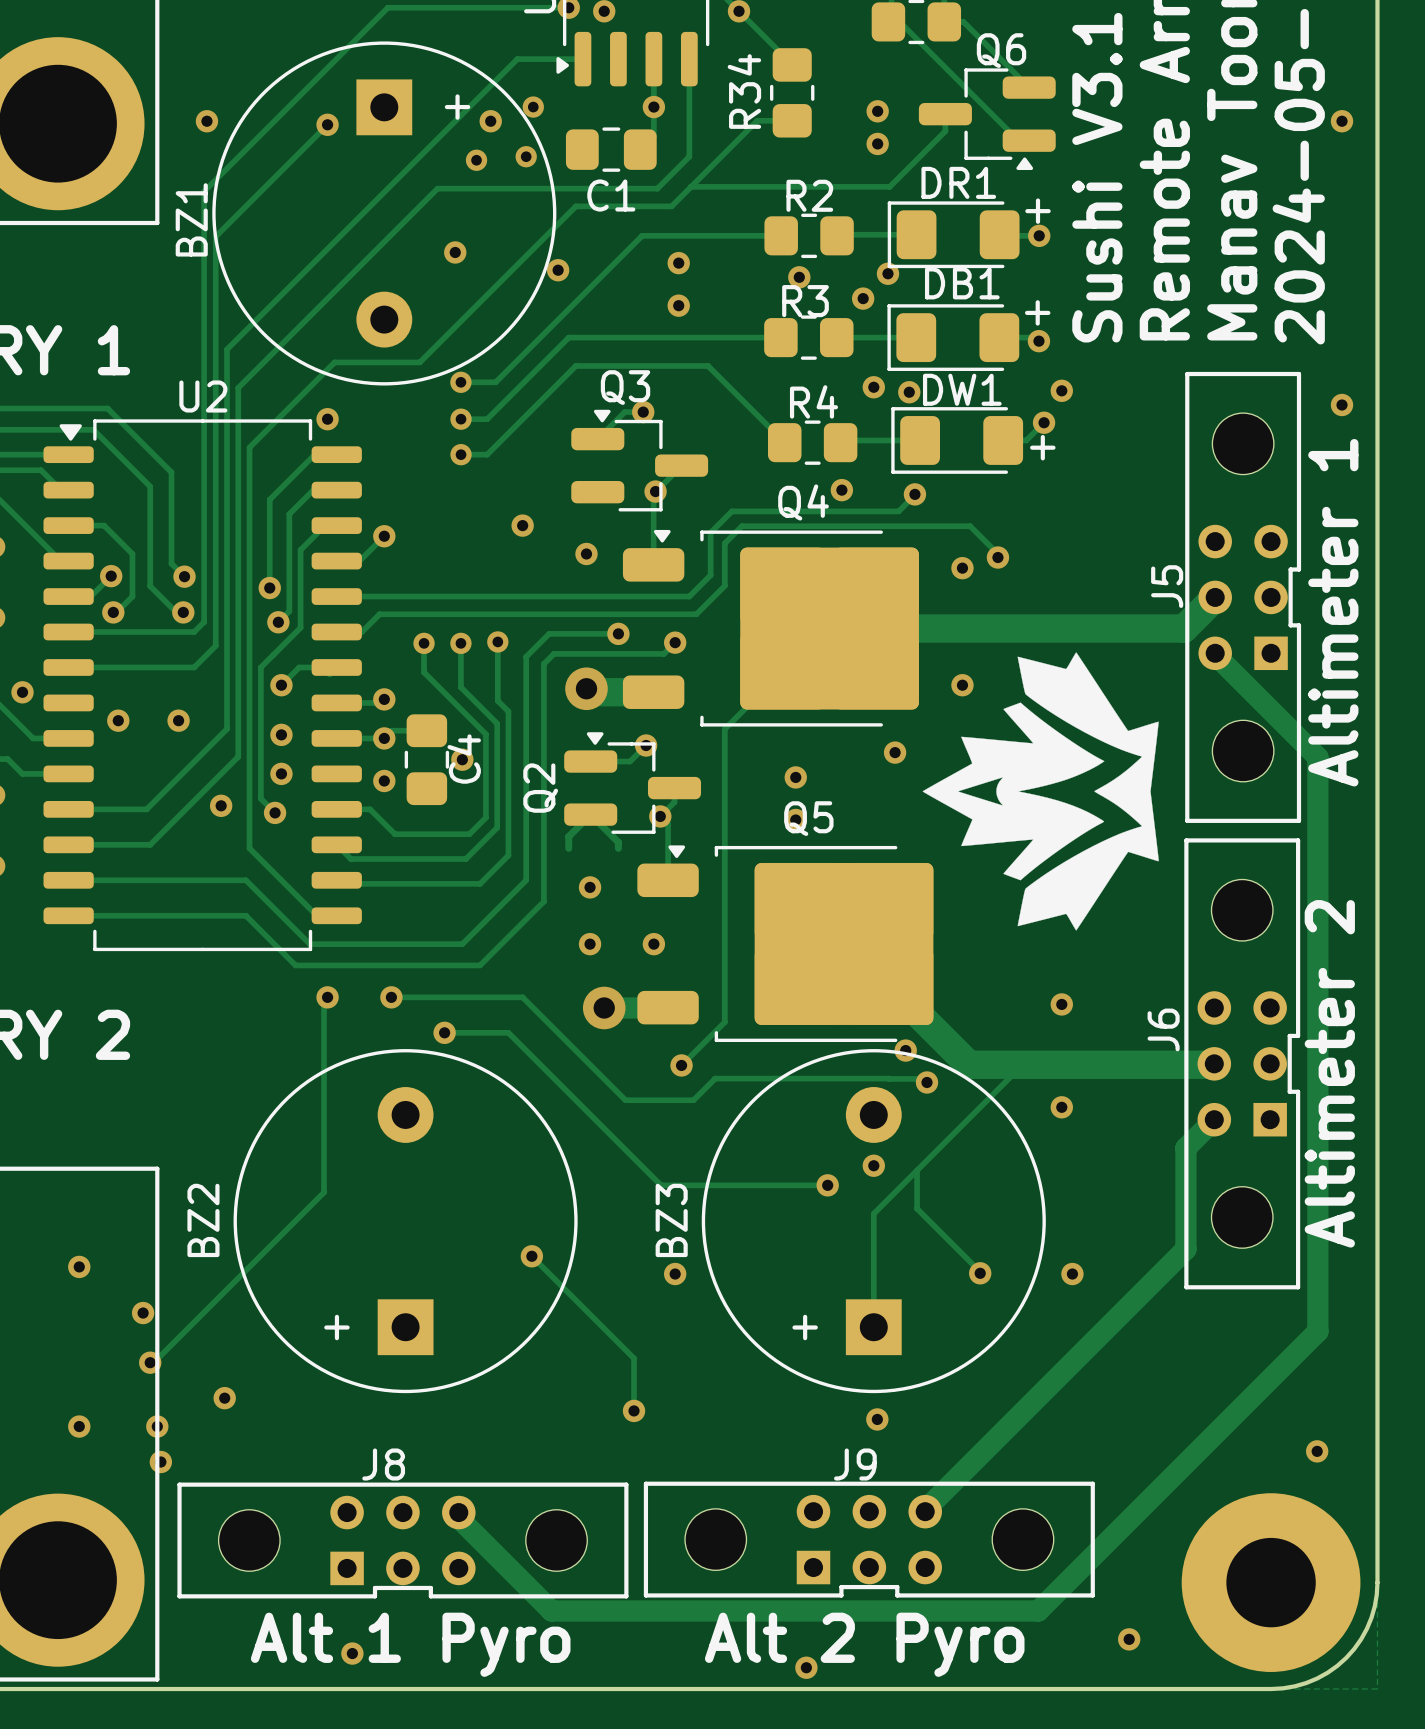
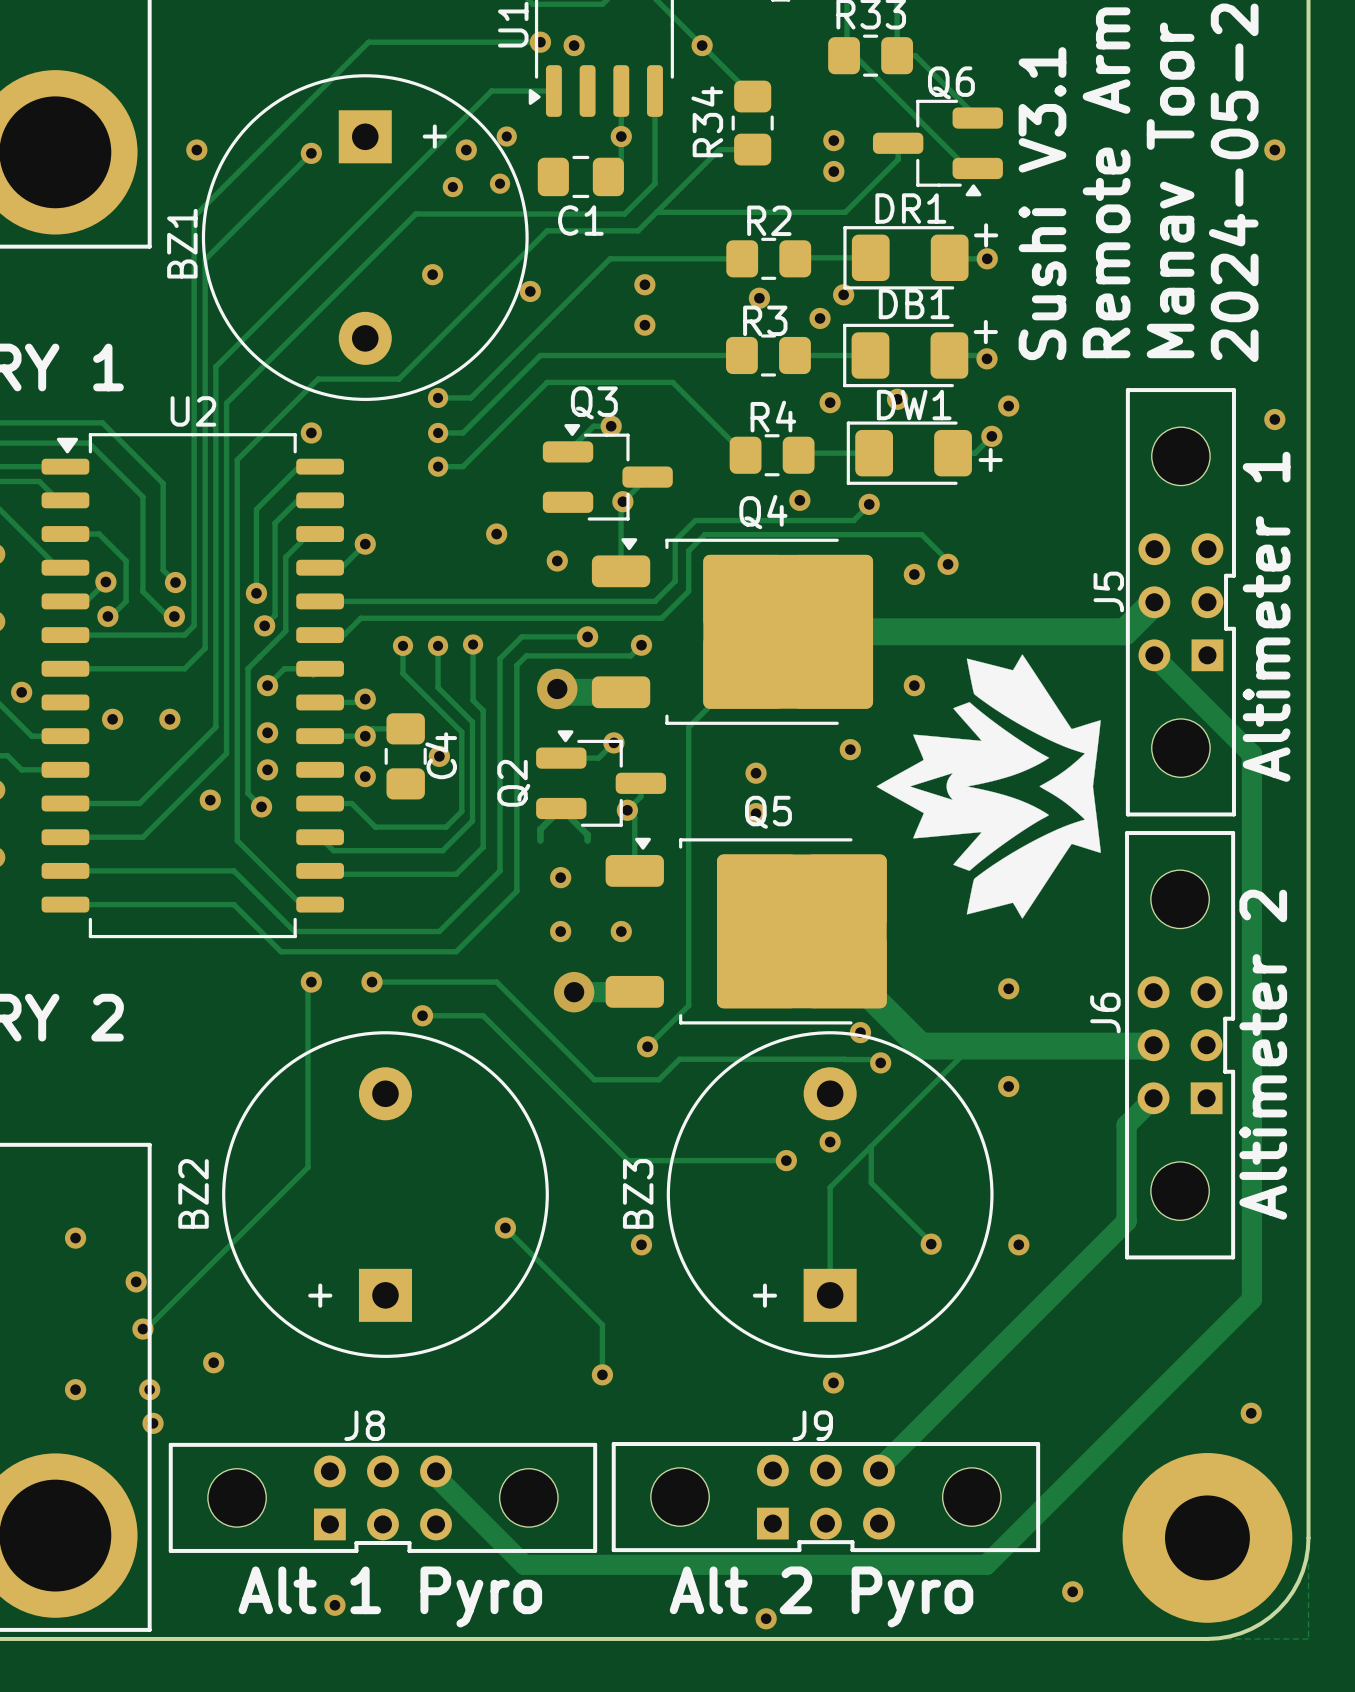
via position: (909, 392) -> (897, 399)

